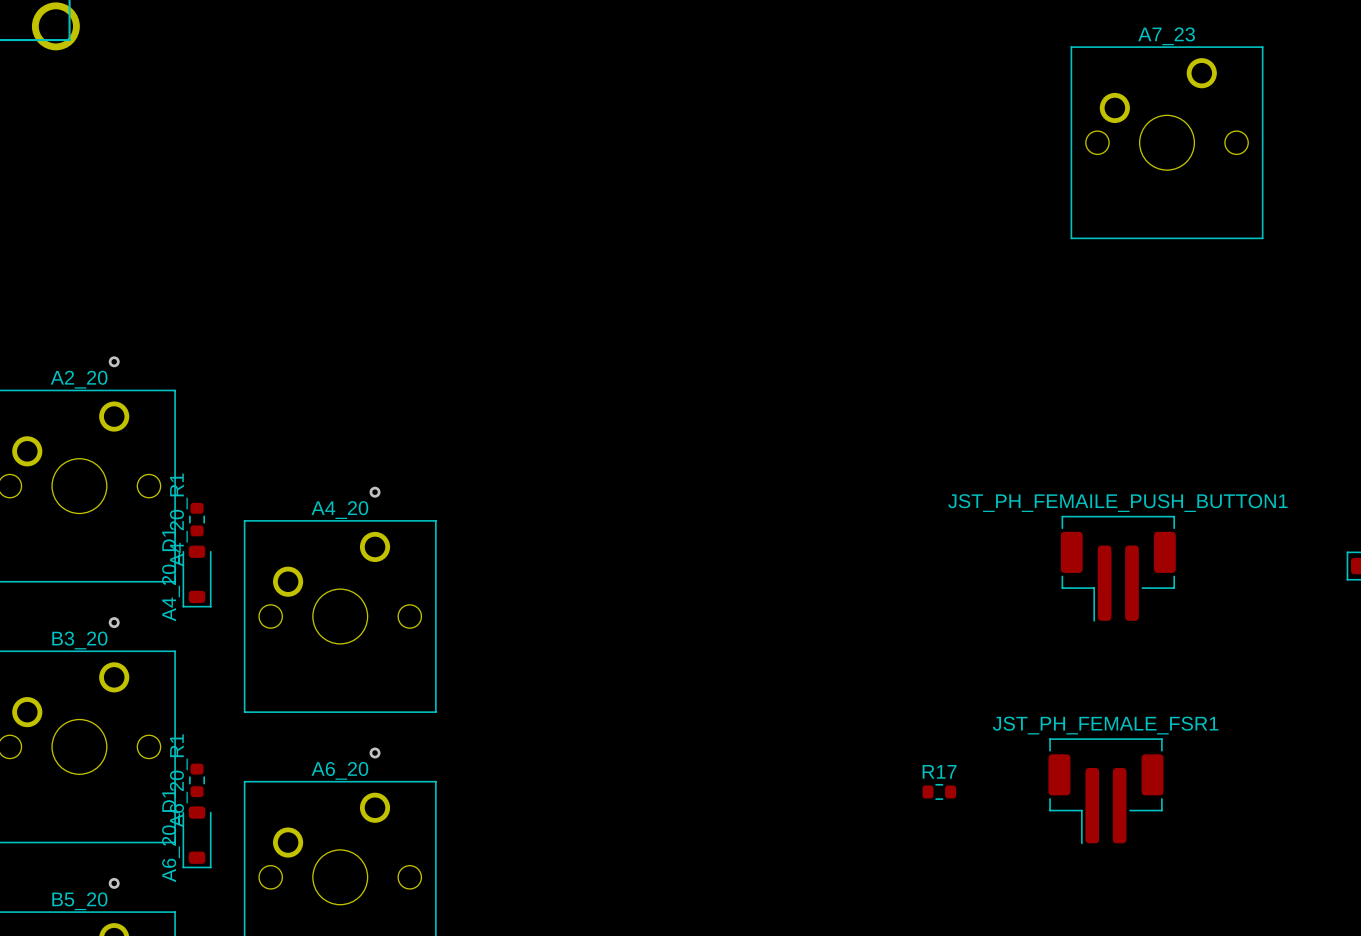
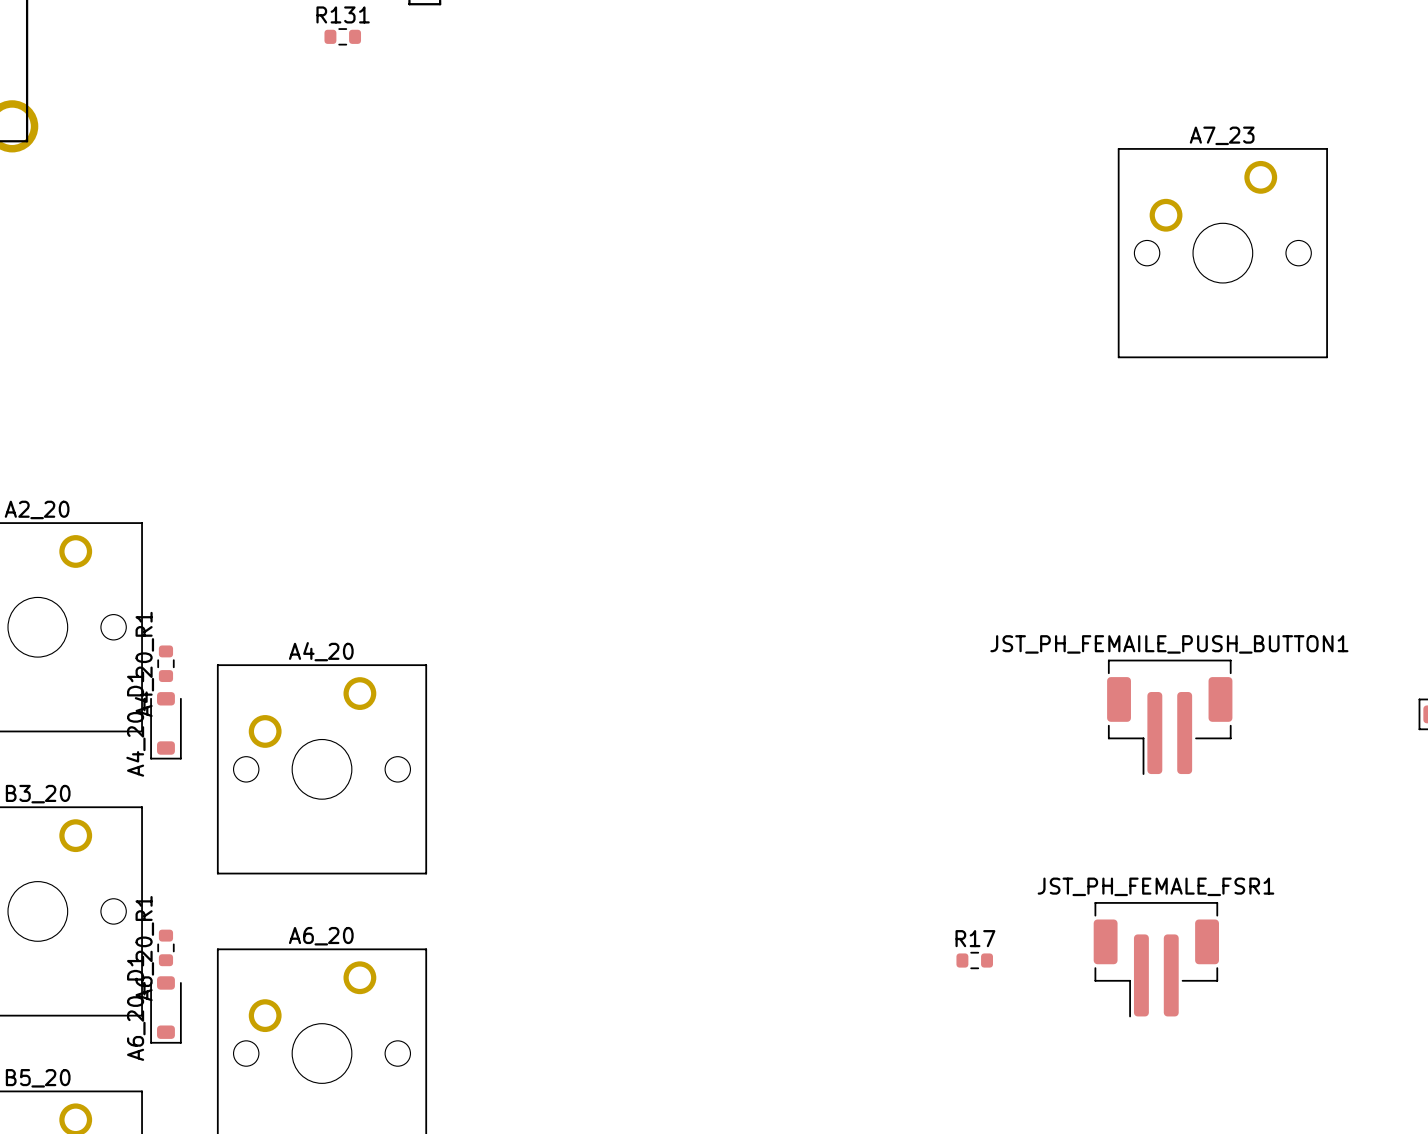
via: (114, 361) -> none
via: (375, 492) -> none
via: (114, 622) -> none
via: (375, 753) -> none
via: (114, 883) -> none

